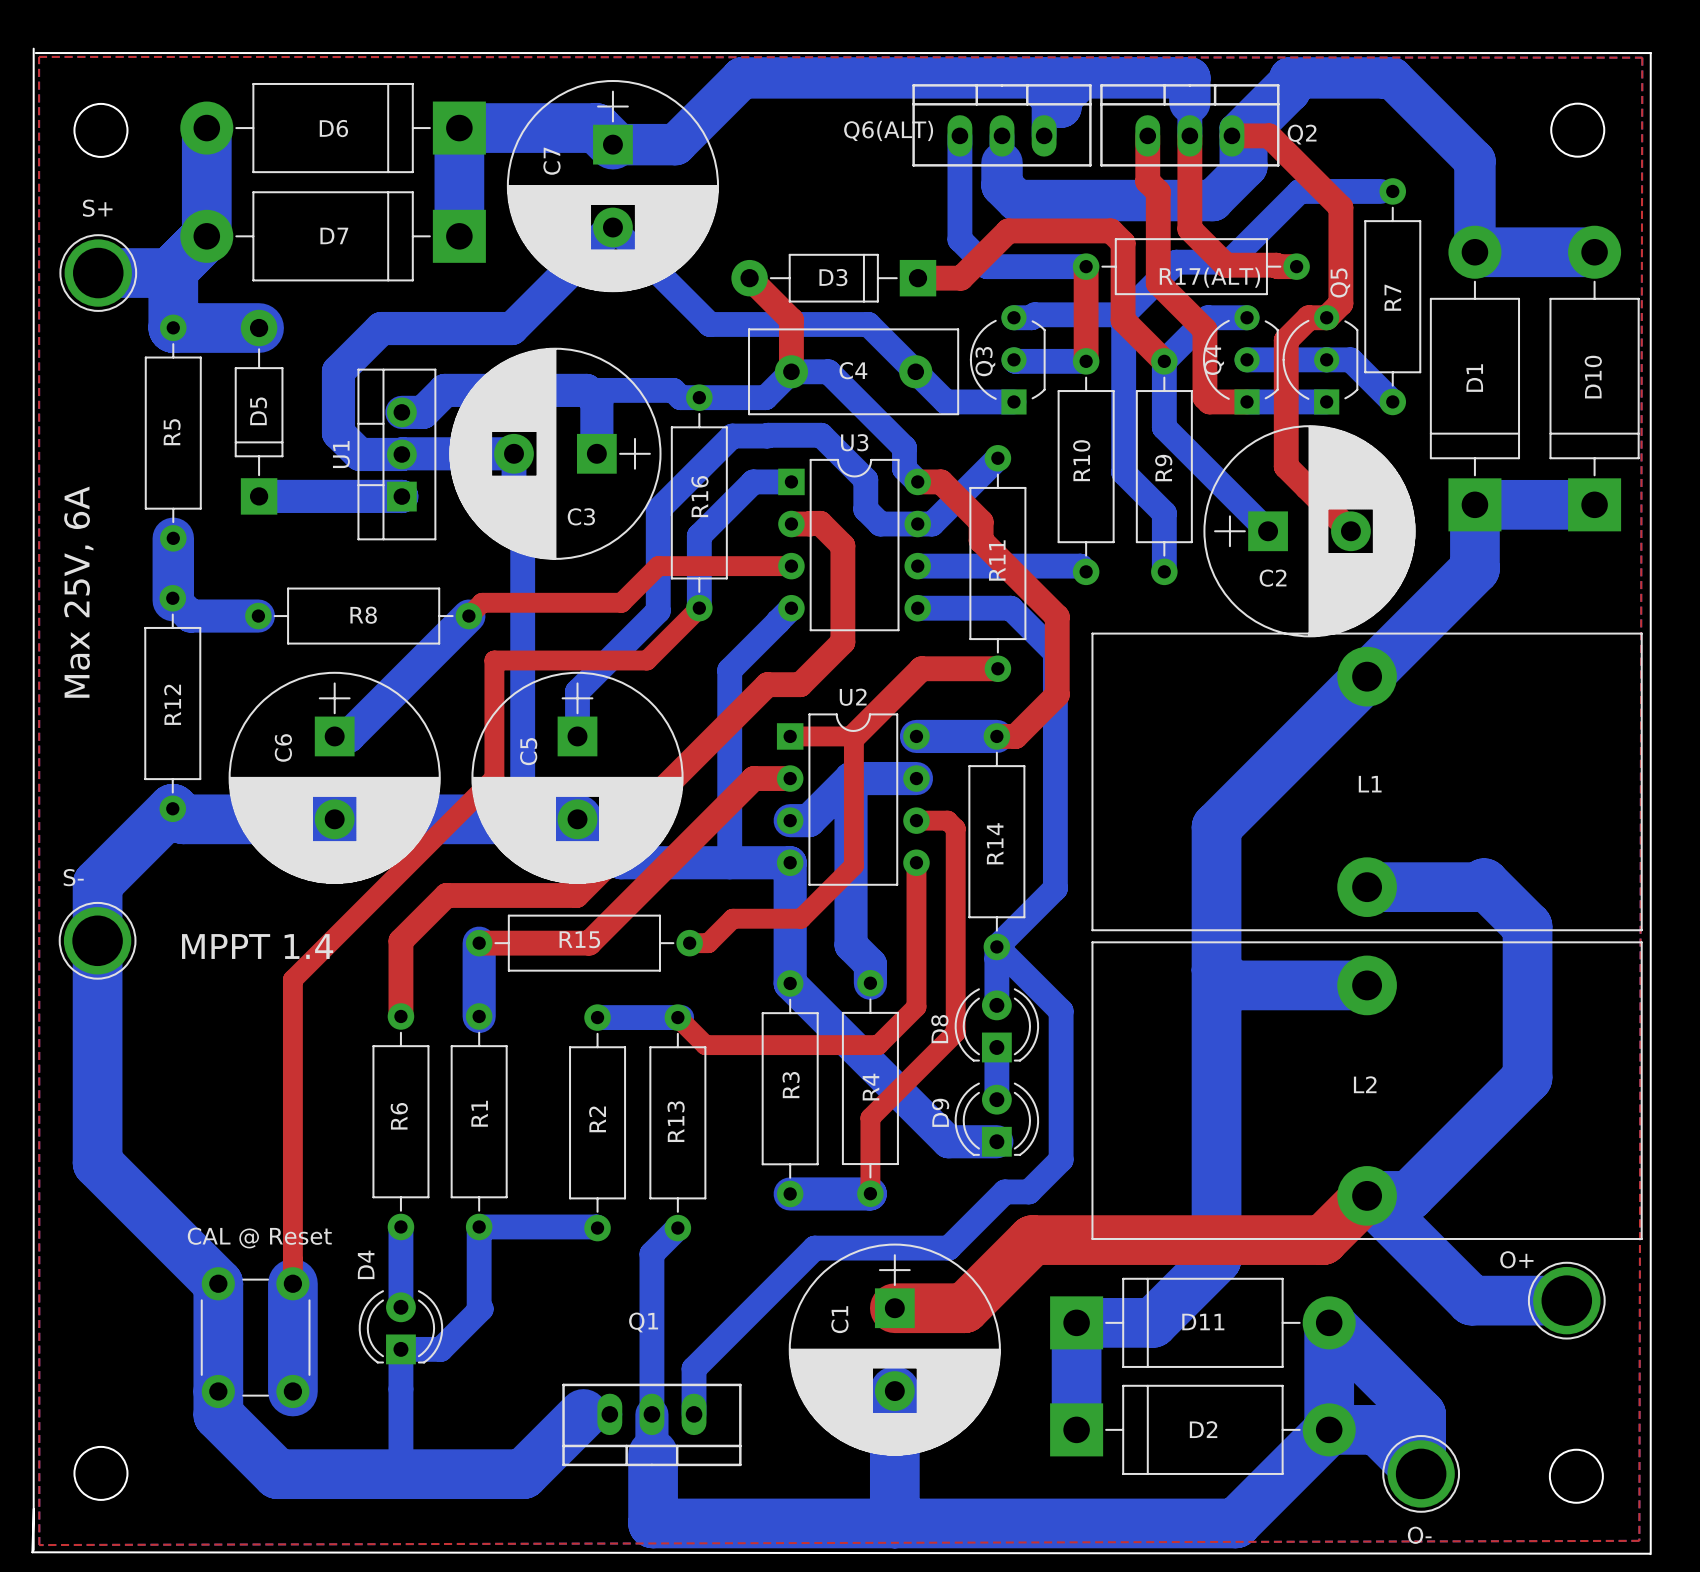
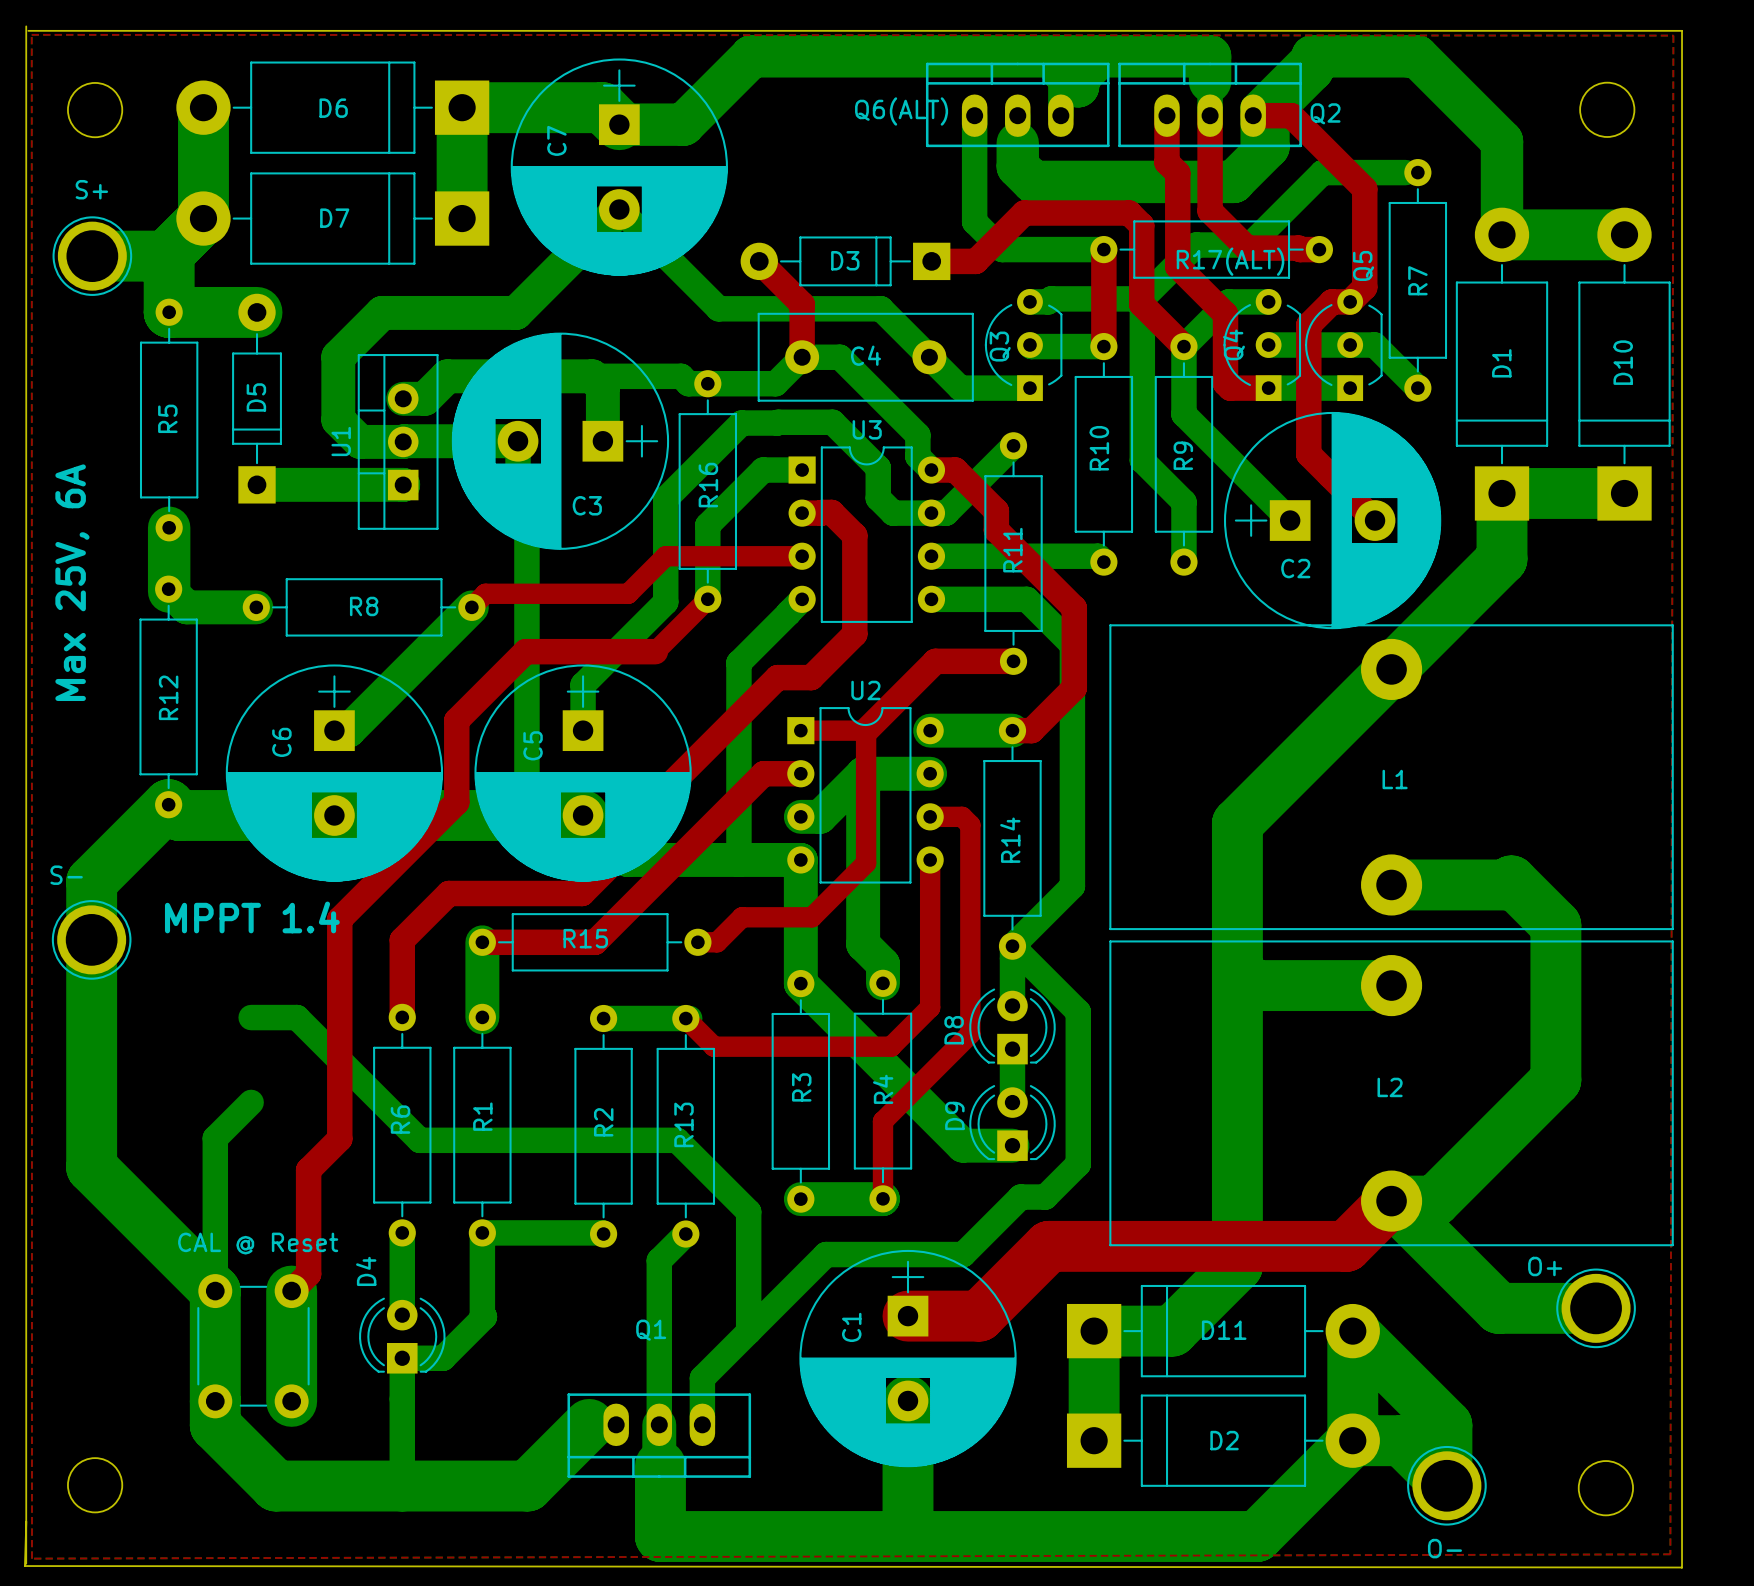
top track: (648, 659) (494, 660) (494, 778) (292, 979) (292, 1283) -> (655, 651) (525, 651) (456, 720) (456, 802) (339, 919) (339, 1138) (308, 1170) (308, 1274) (291, 1291)
text position: MPPT 1.4 (257, 946) -> MPPT 1.4 (252, 917)
bottom track: none -> (251, 1017) (296, 1017) (419, 1140) (677, 1140) (748, 1211) (748, 1331)
bottom track: none -> (251, 1102) (215, 1138) (215, 1291)

